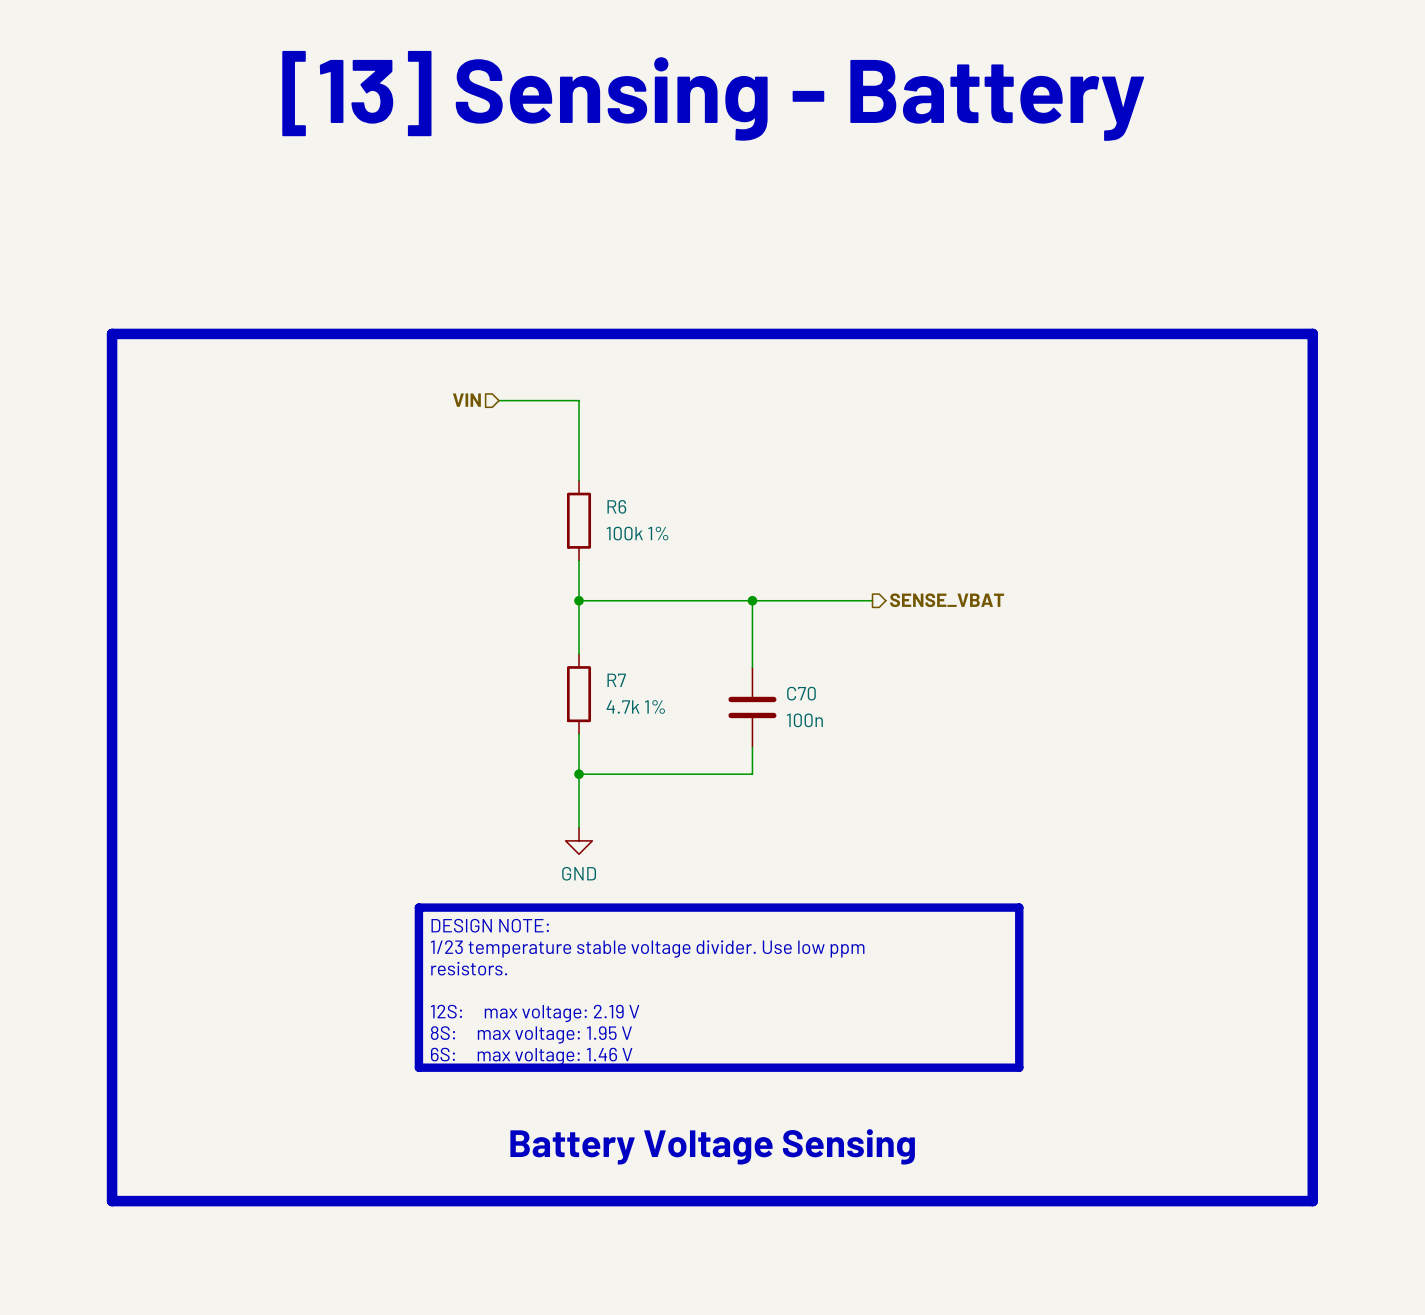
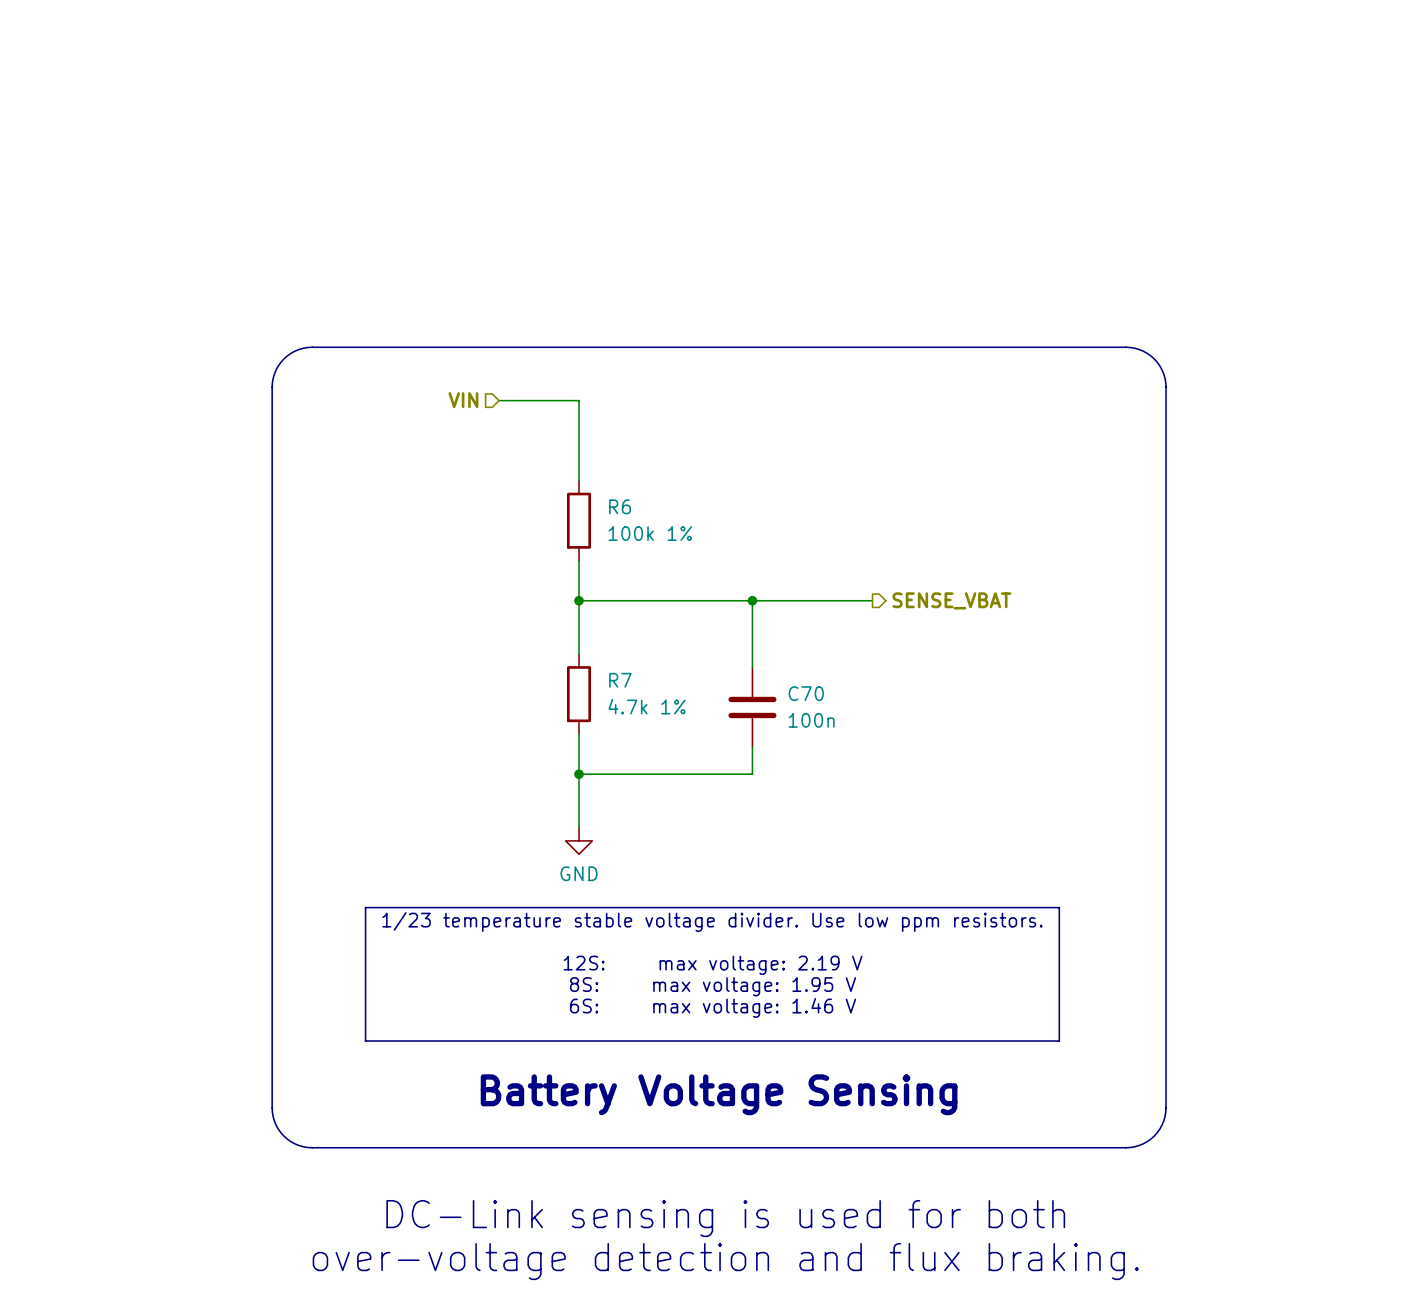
text: [13] Sensing - Battery (713, 95) -> none
line: (112, 333) (1312, 333) (1312, 1201) (112, 1201) (112, 333) -> (312, 347) (298, 349) (283, 358) (274, 374) (272, 387) (272, 1107) (274, 1120) (283, 1136) (298, 1145) (312, 1147) (1125, 1147) (1139, 1145) (1154, 1136) (1163, 1120) (1166, 1107) (1166, 387) (1163, 374) (1154, 358) (1139, 349) (1125, 347) (312, 347)
line: (418, 907) (418, 1067) (1019, 1067) (1019, 907) -> (418, 907) (365, 907) (365, 1041) (1059, 1041) (1059, 907) (1019, 907)
line width: thick (418, 907) (1019, 907) -> thin (418, 907) (1019, 907)
text: none -> 1/23 temperature stable voltage divider. Use low ppm resistors. (712, 922)
text: DESIGN NOTE: (490, 925) -> none
text: 1/23 temperature stable voltage divider. Use low ppm (647, 948) -> none
text: none -> 12S: max voltage: 2.19 V (713, 965)
text: resistors. (469, 968) -> none
text: none -> 8S: max voltage: 1.95 V (713, 986)
text: none -> 6S: max voltage: 1.46 V (713, 1007)
text: 12S: max voltage: 2.19 V (535, 1013) -> none
text: 8S: max voltage: 1.95 V (531, 1034) -> none
text: 6S: max voltage: 1.46 V (531, 1056) -> none
text position: Battery Voltage Sensing (712, 1146) -> Battery Voltage Sensing (719, 1094)
text: none -> DC-Link sensing is used for both (725, 1218)
text: none -> over-voltage detection and flux braking. (725, 1261)

